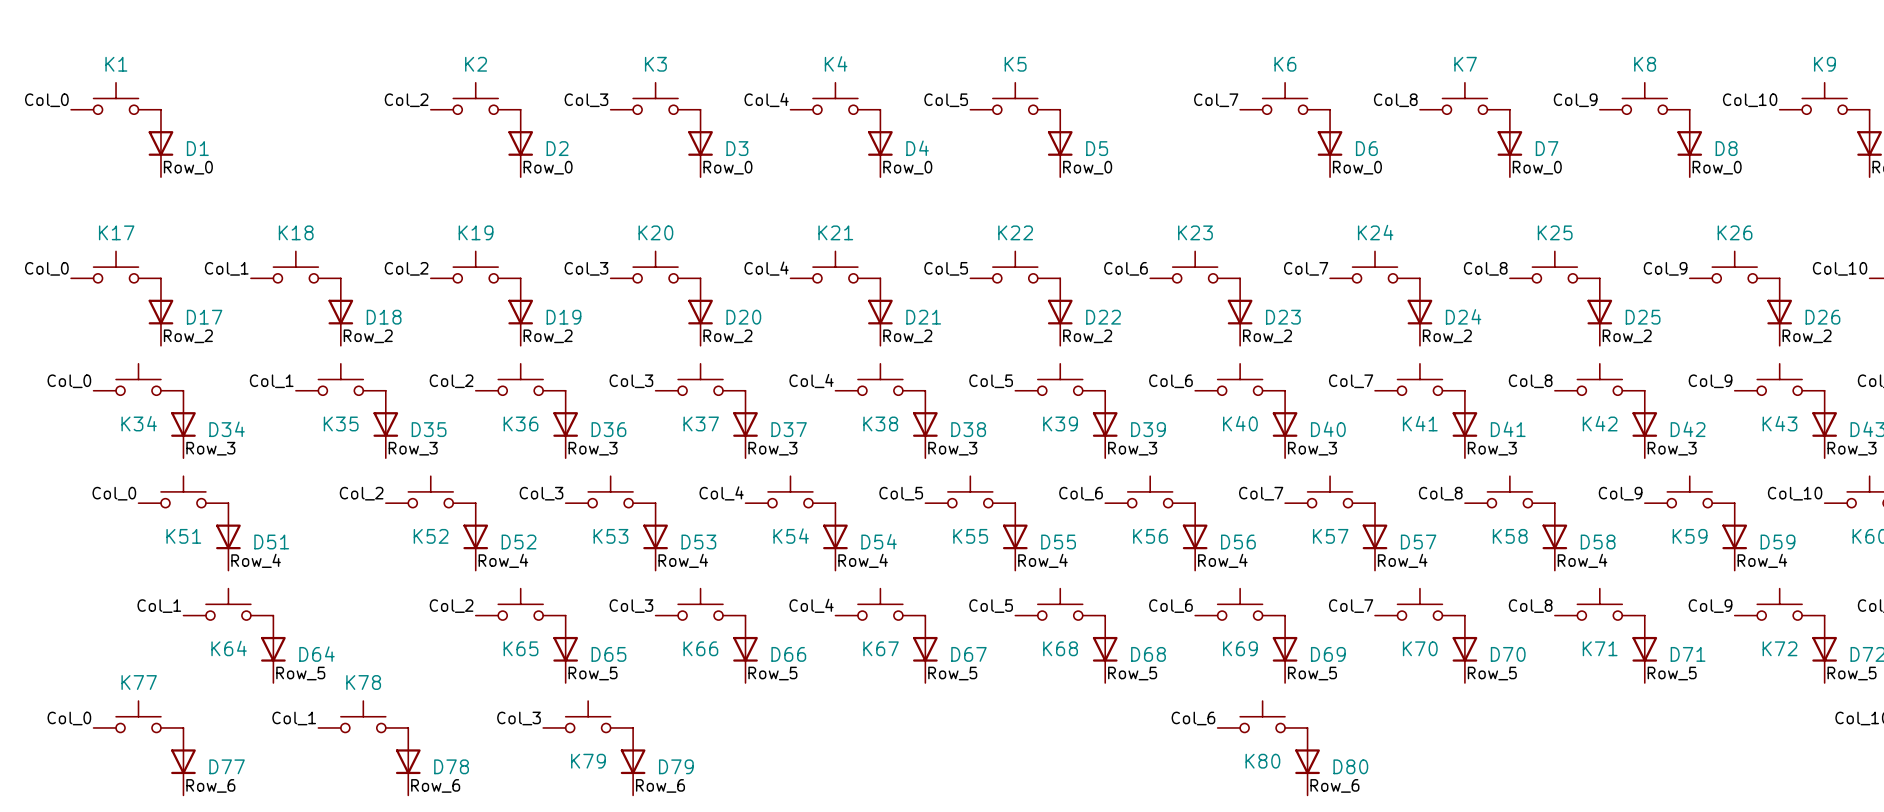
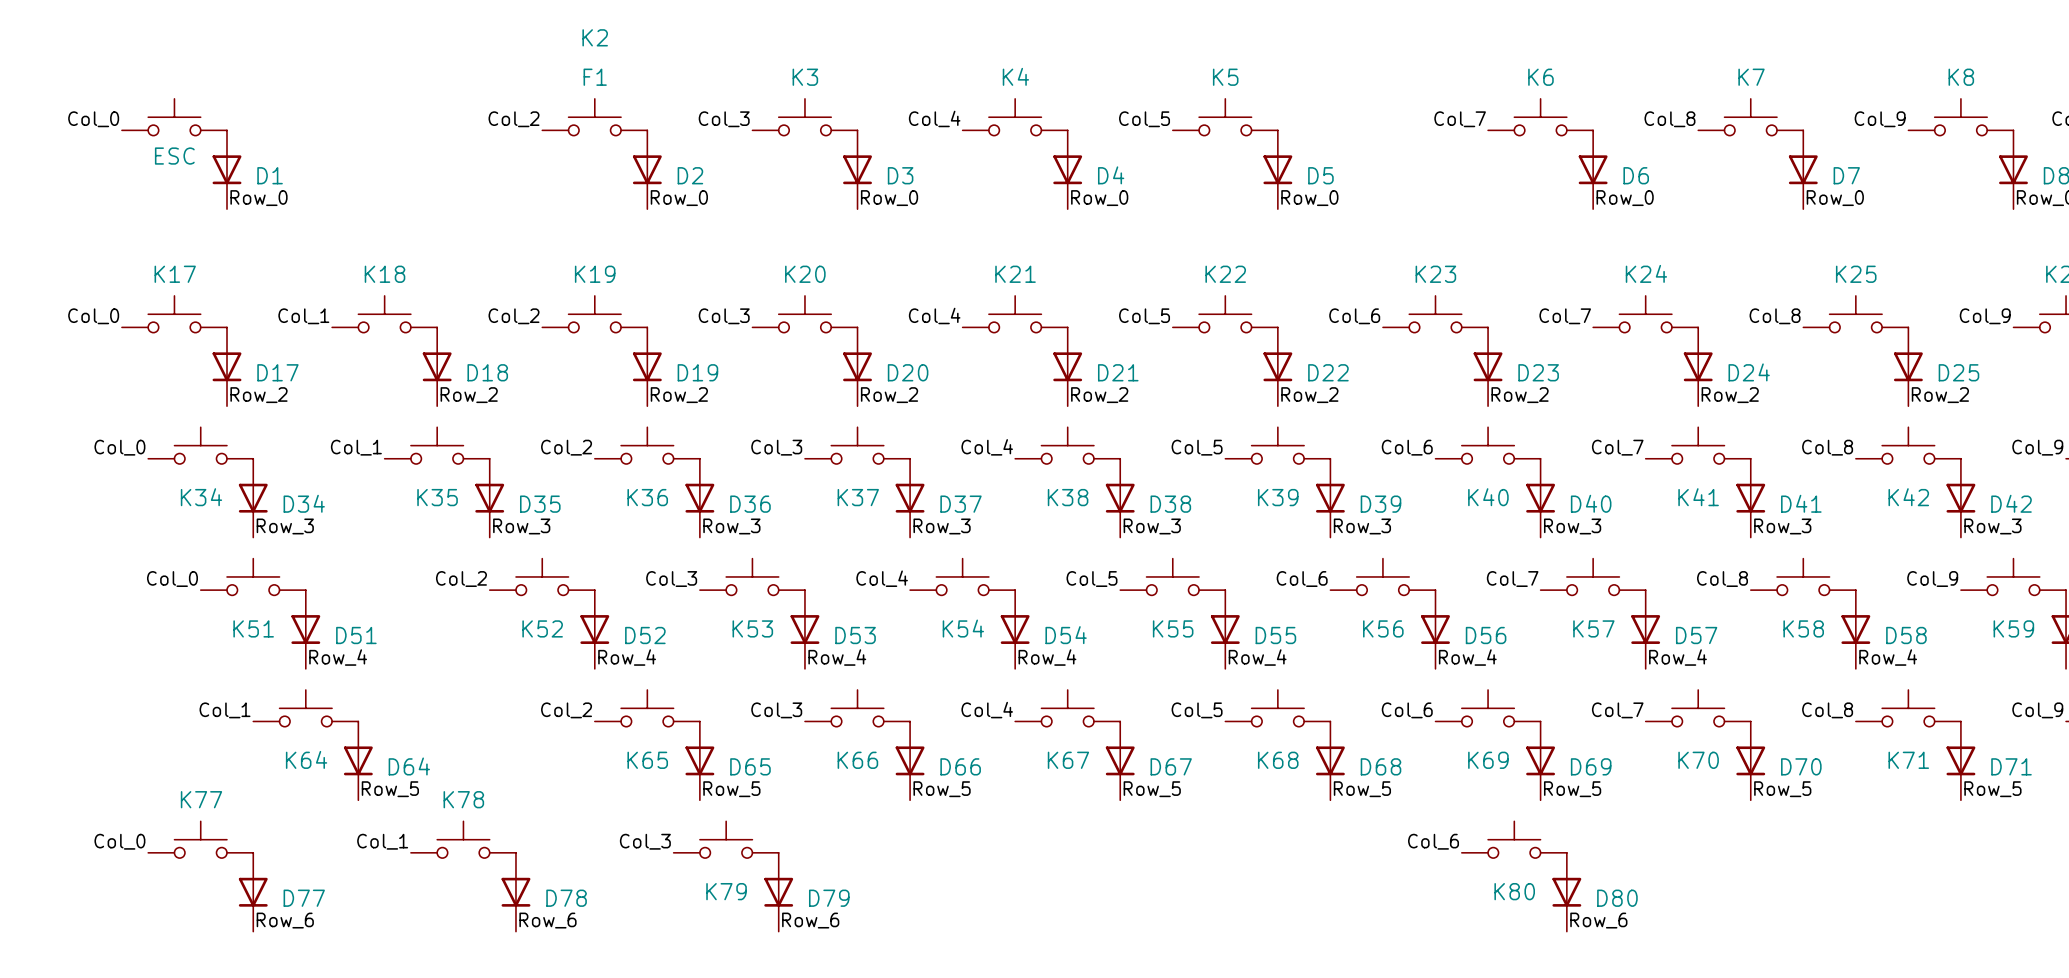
K1 name: K1 (116, 64) -> none
K2 name position: K2 (476, 64) -> K2 (595, 37)
K2 value: none -> F1 (595, 77)
K1 value: none -> ESC (174, 156)

